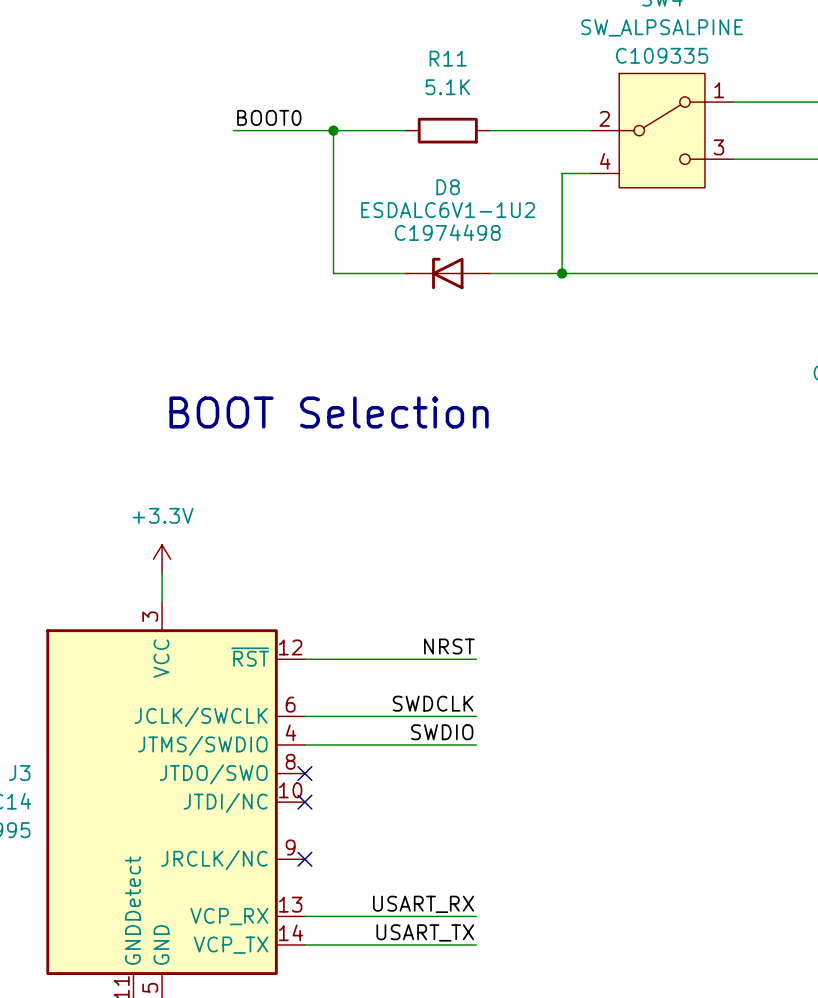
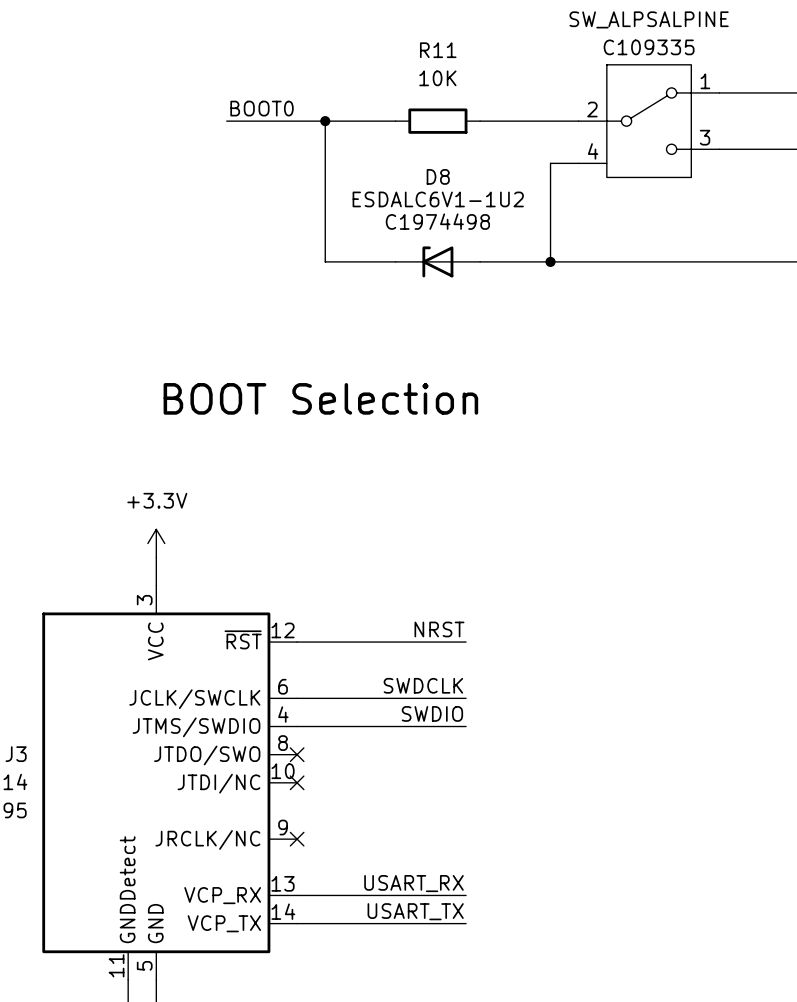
R11 value: 5.1K (447, 87) -> 10K (437, 78)

